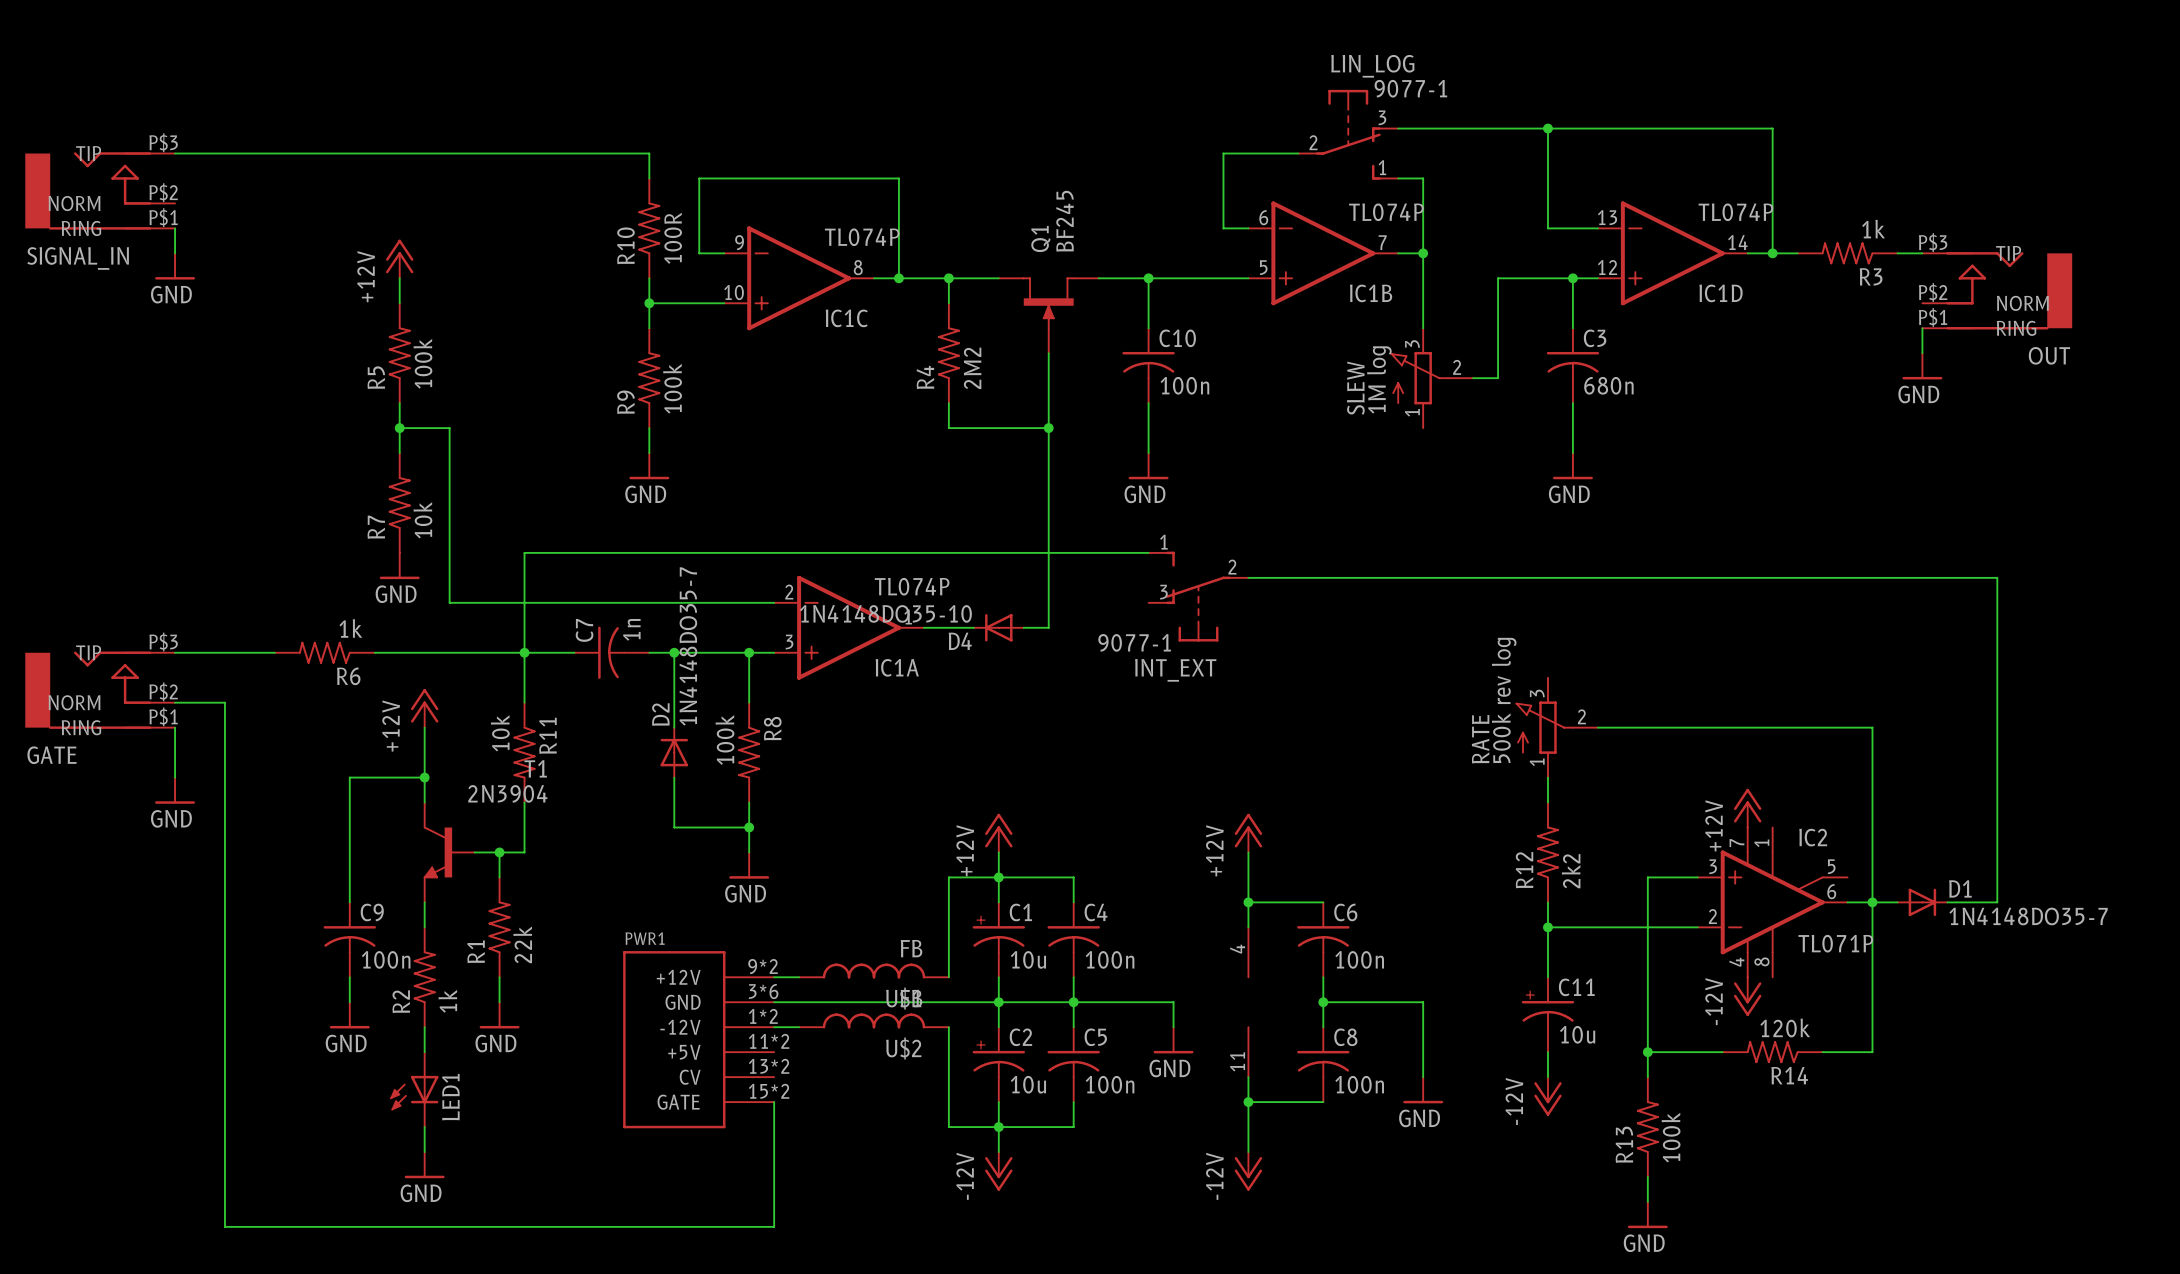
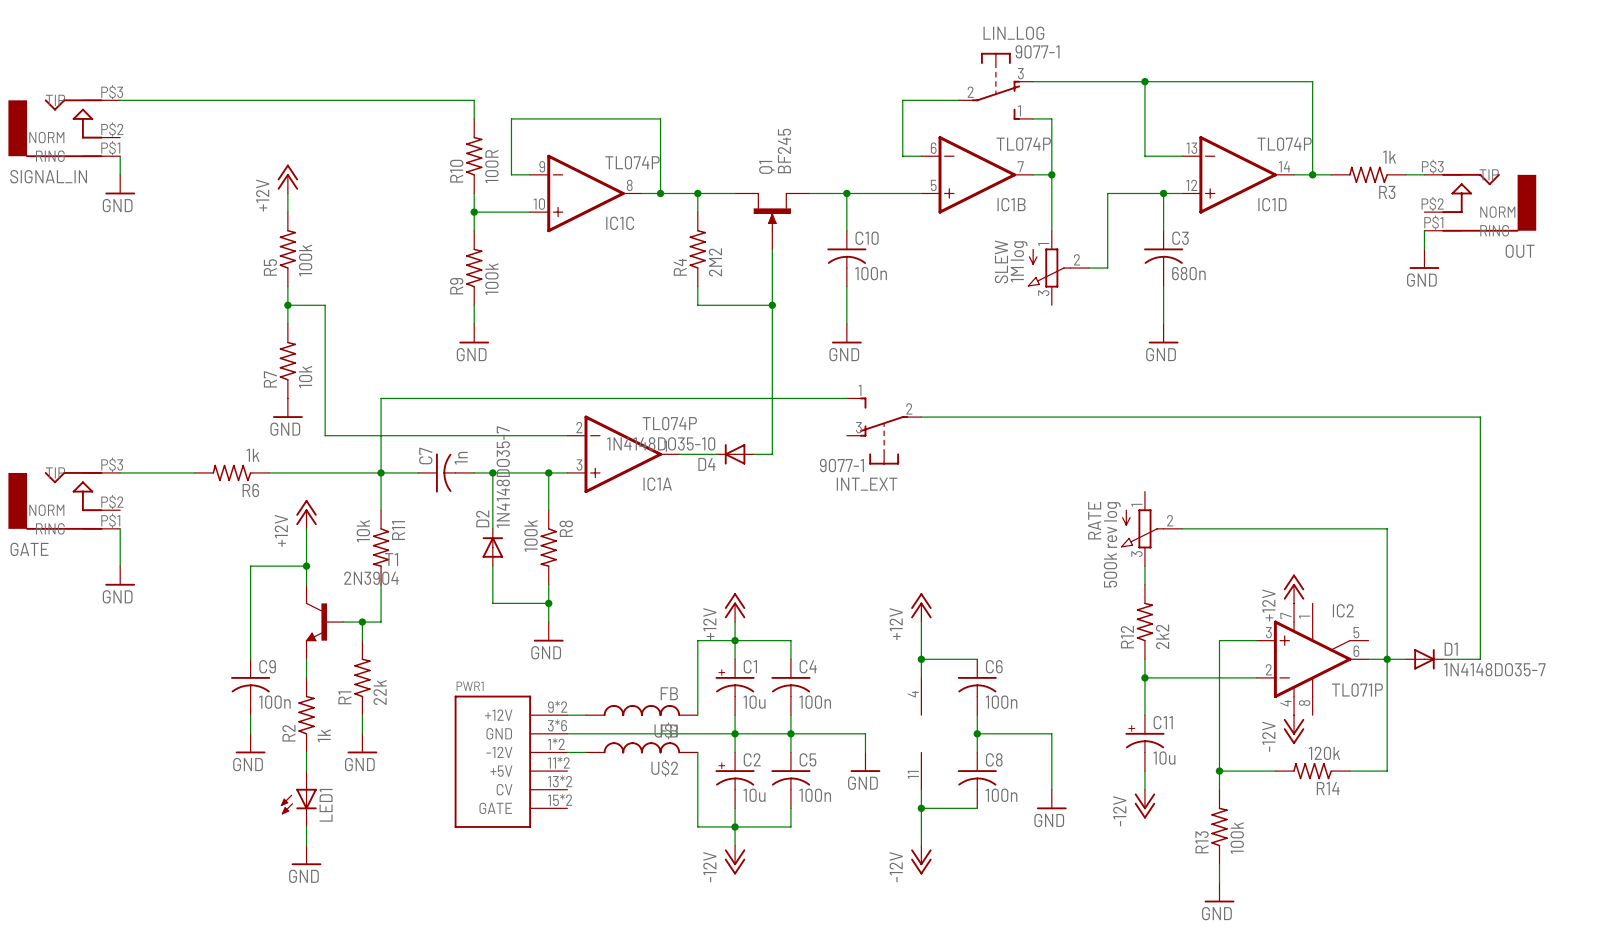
SLEW flip: as is (1419, 378) -> up-down (1049, 268)
wire: (175, 702) (224, 702) (224, 1226) (774, 1226) (774, 1102) -> none
RATE flip: as is (1544, 727) -> up-down (1142, 528)

